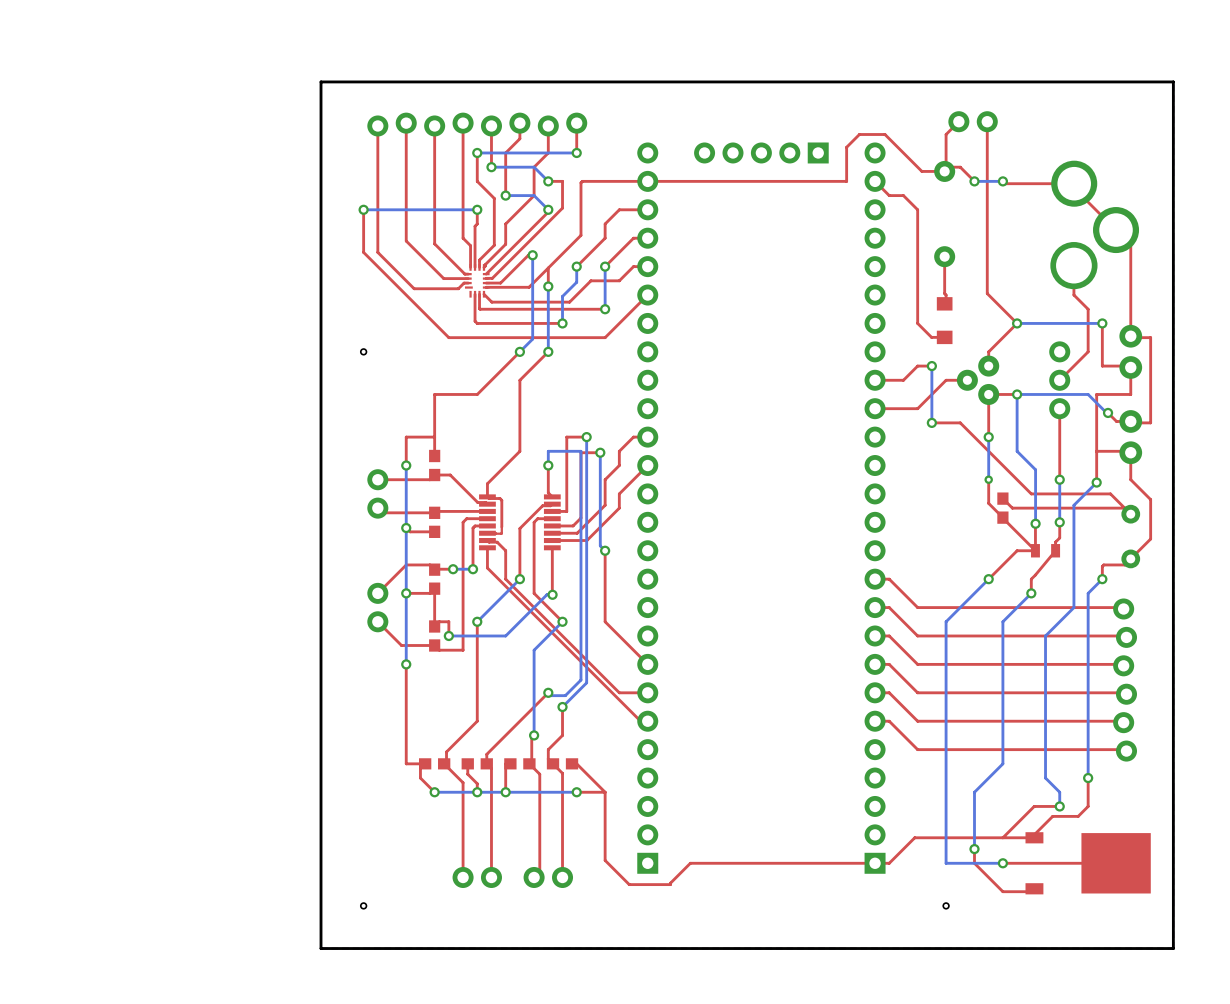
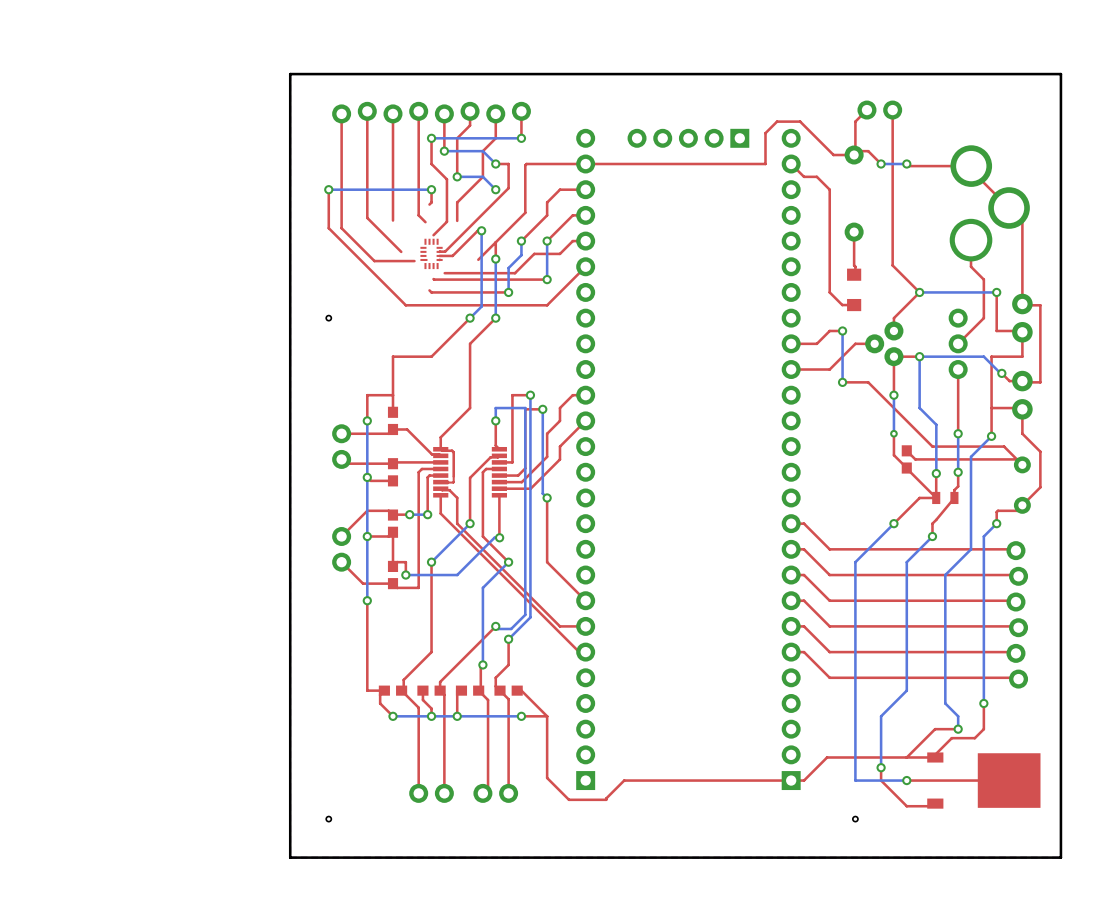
top track: (548, 212) (486, 274) -> none
top track: (475, 226) (475, 267) -> none
top track: (434, 243) (464, 274) (468, 274) -> none
top track: (505, 244) (483, 267) -> none
top track: (470, 245) (470, 267) -> none
top track: (479, 260) (479, 267) -> none
top track: (468, 278) (443, 278) -> none
top track: (468, 283) (464, 283) (458, 288) -> none
top track: (529, 287) (486, 287) -> none
top track: (475, 294) (475, 321) -> none
top track: (479, 294) (479, 308) -> none
top track: (483, 294) (491, 302) -> none

